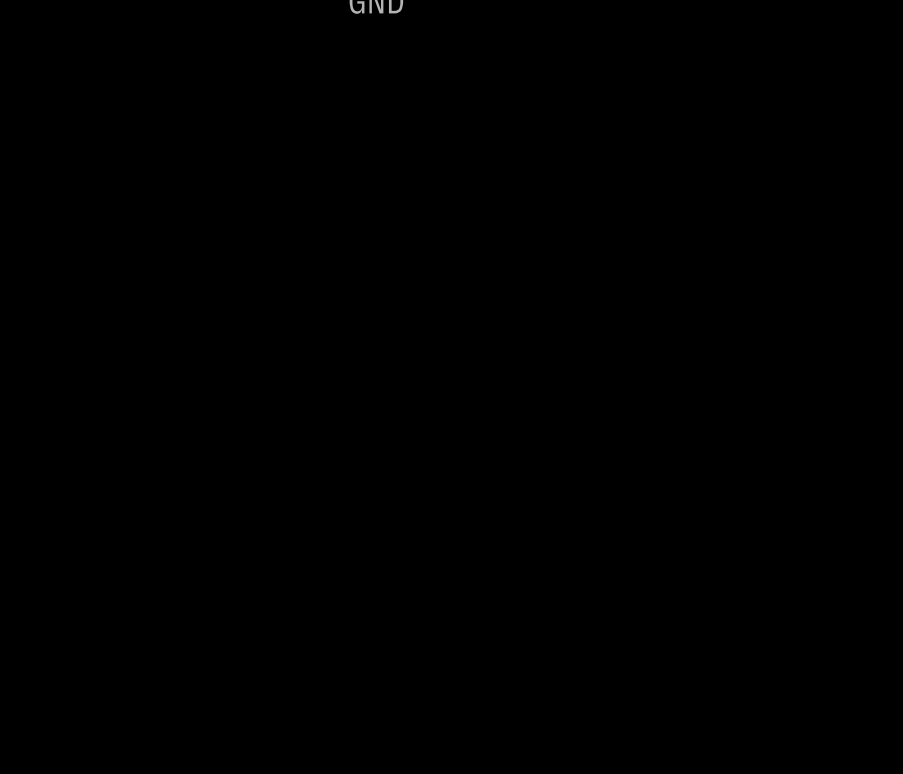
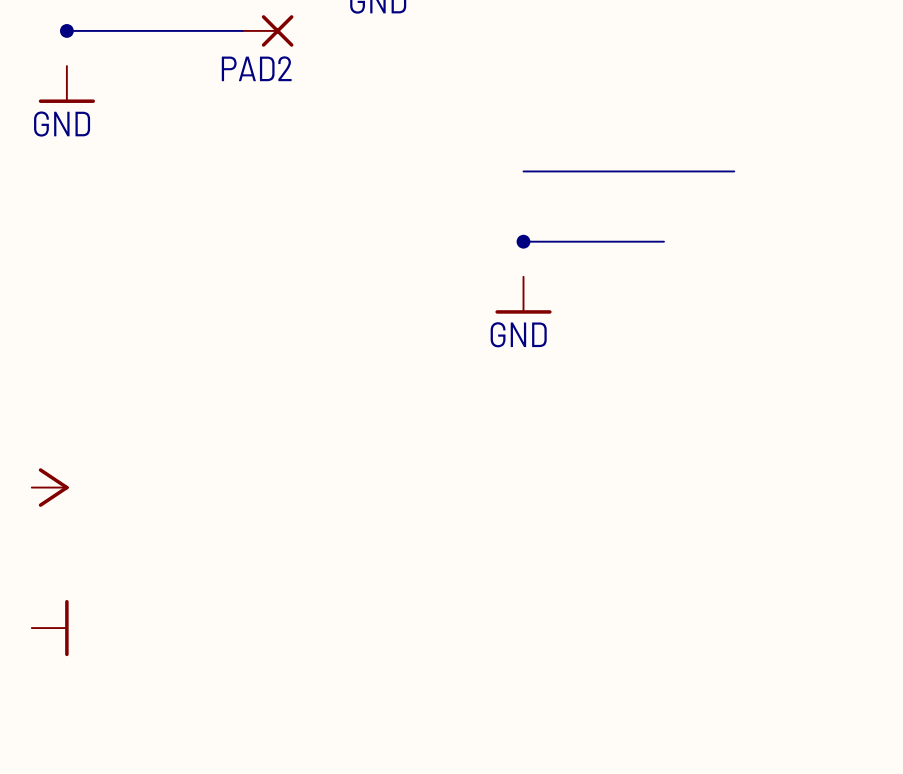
wire: none -> (66, 30) (242, 30)
junction: none -> (66, 30)
PAD2: none -> (267, 30)
power symbol: none -> GND (66, 84)
wire: none -> (523, 171) (734, 171)
wire: none -> (523, 241) (663, 241)
junction: none -> (523, 241)
power symbol: none -> GND (523, 295)
power symbol: none -> (50, 487)
power symbol: none -> (50, 628)

